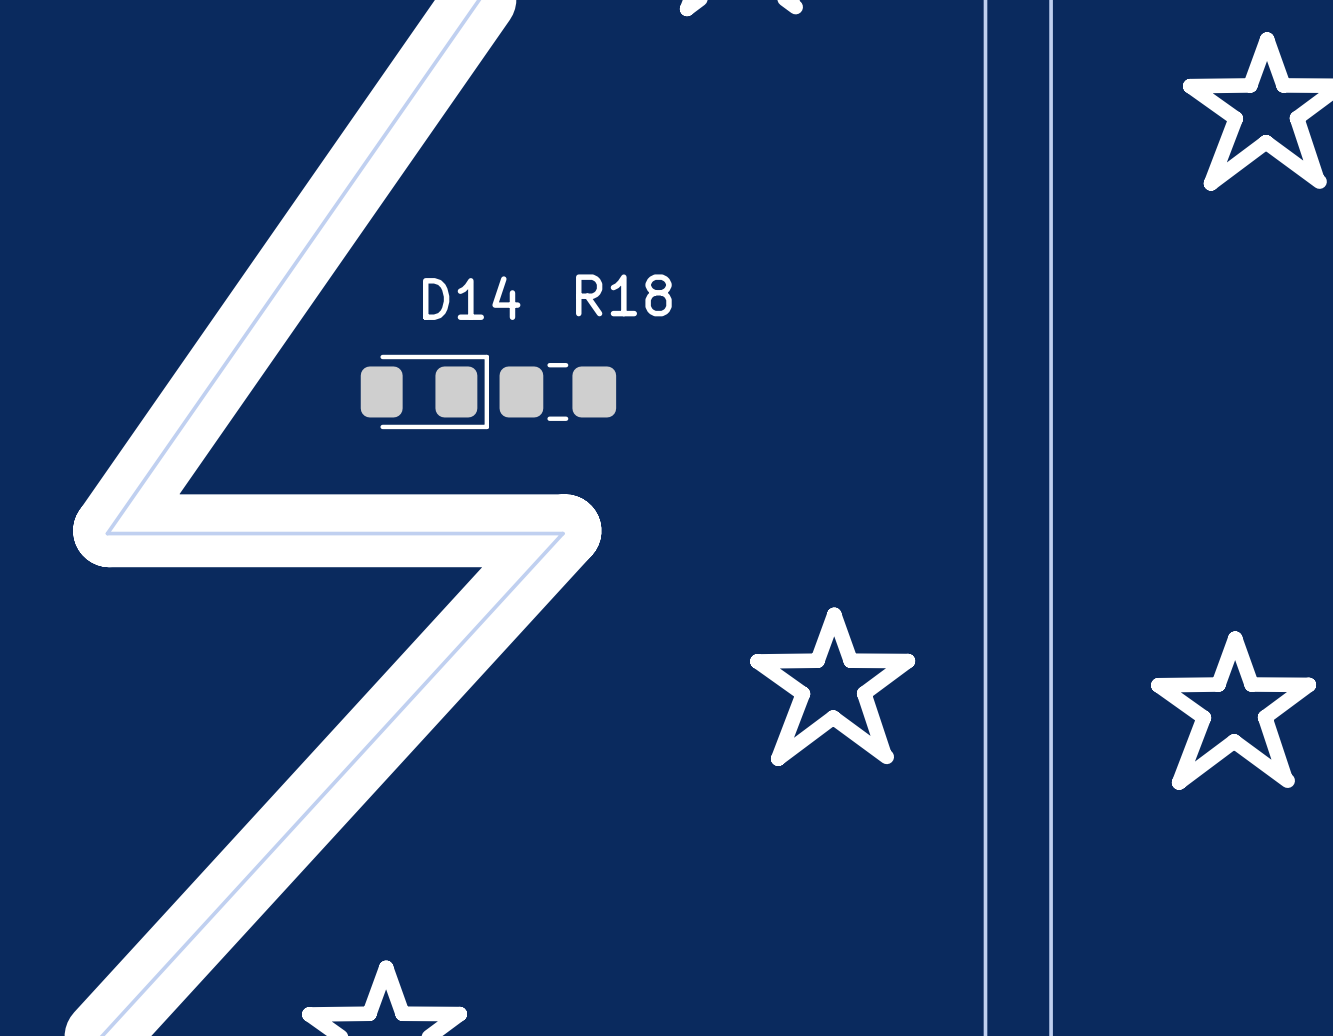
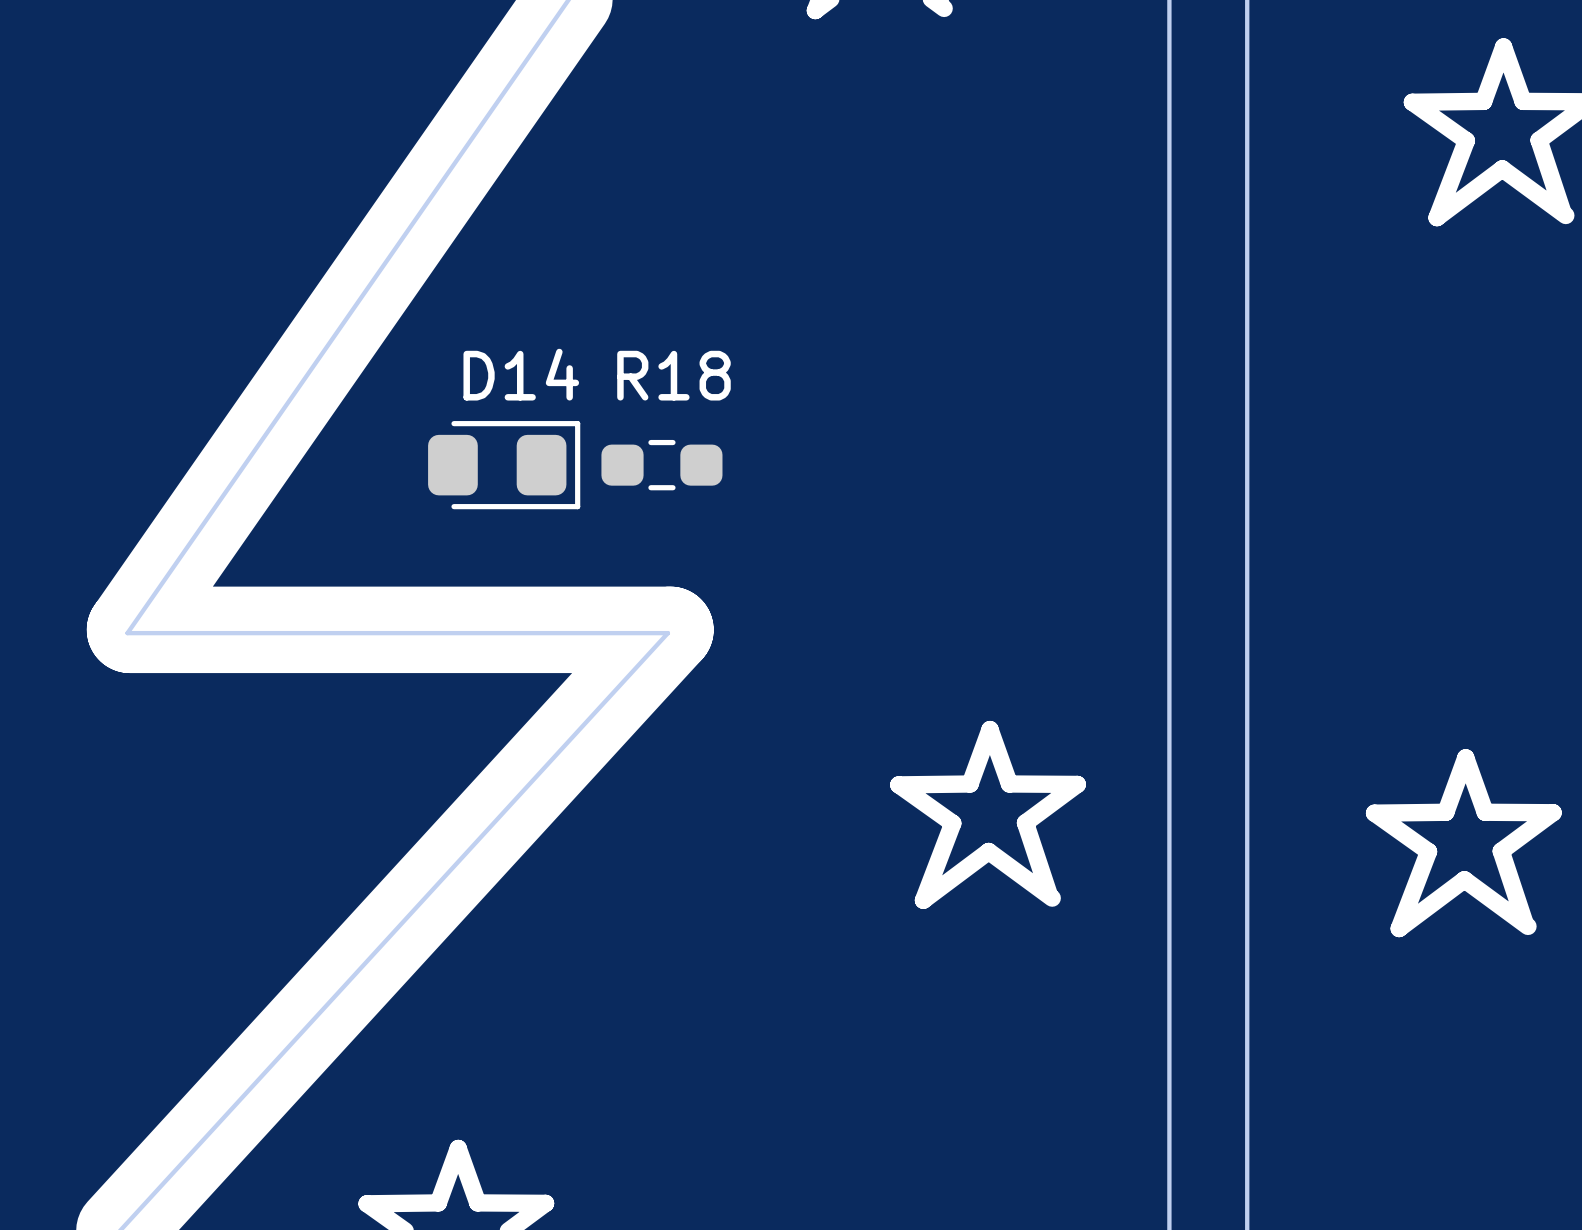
R18 name position: R18 (623, 295) -> R18 (673, 375)
D14 name position: D14 (471, 298) -> D14 (521, 374)
R18 footprint: [499, 363, 617, 421] -> [601, 439, 723, 491]

